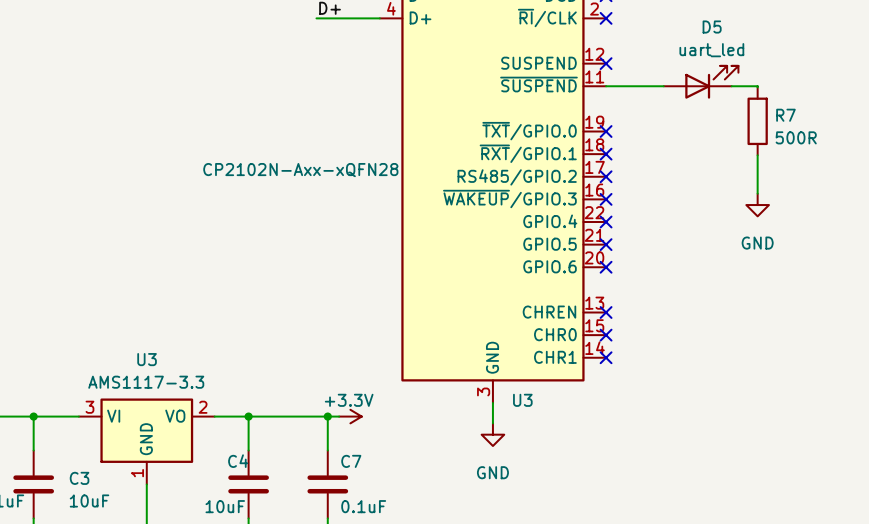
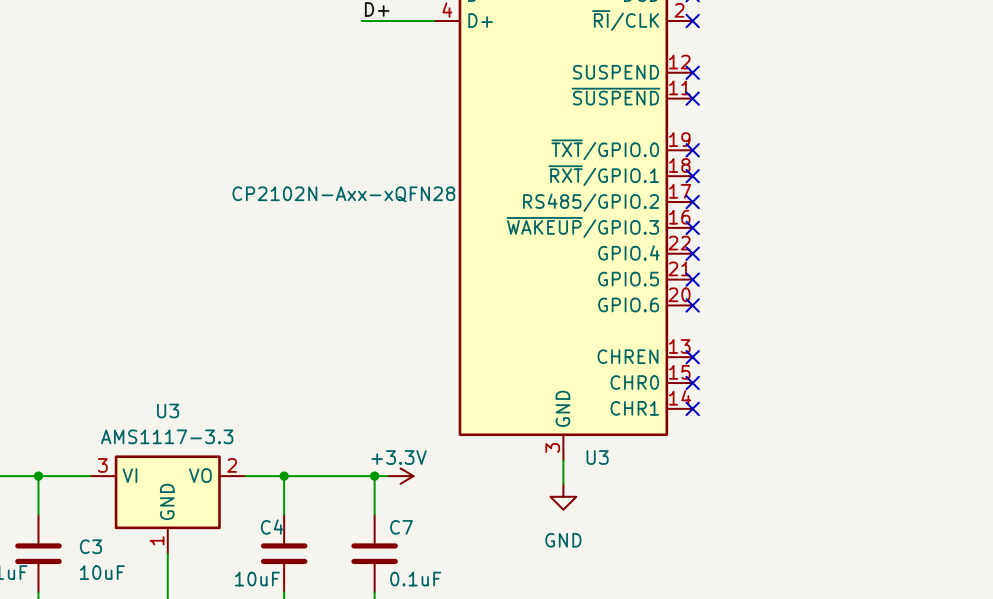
D5: uart_led (701, 82) -> none
wire: (606, 86) (663, 86) -> none
no-connect mark: none -> (692, 98)
wire: (731, 86) (757, 87) -> none
R7: 500R (757, 121) -> none
wire: (757, 155) (757, 193) -> none
power symbol: GND (757, 205) -> none

